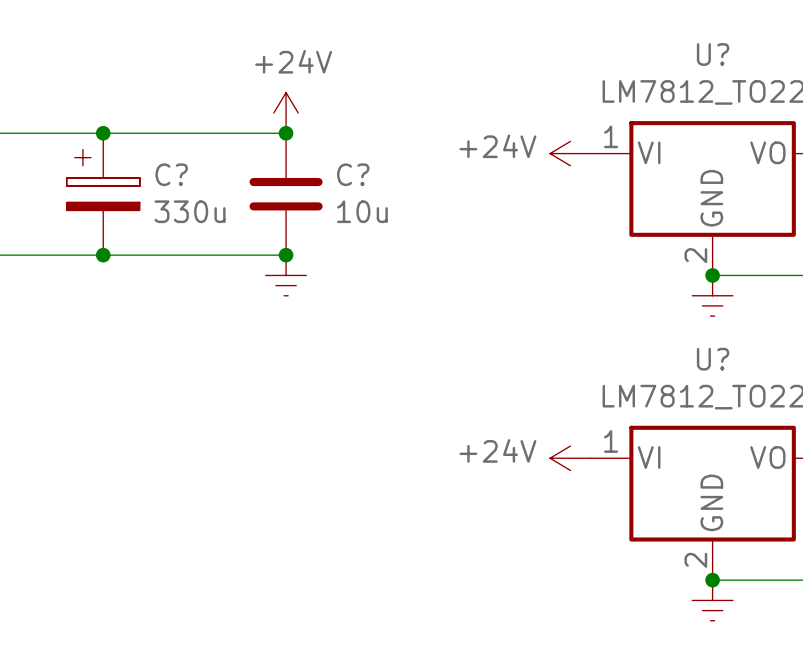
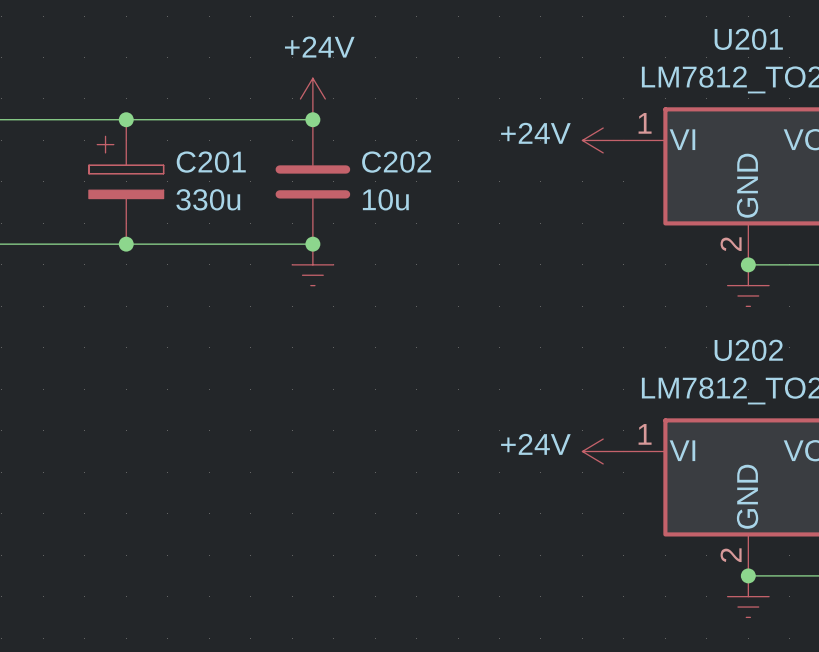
U? name: U? (713, 54) -> U201 (748, 39)
C? name: C? (171, 174) -> C201 (211, 162)
C? name: C? (353, 174) -> C202 (396, 162)
U? name: U? (713, 359) -> U202 (748, 350)

